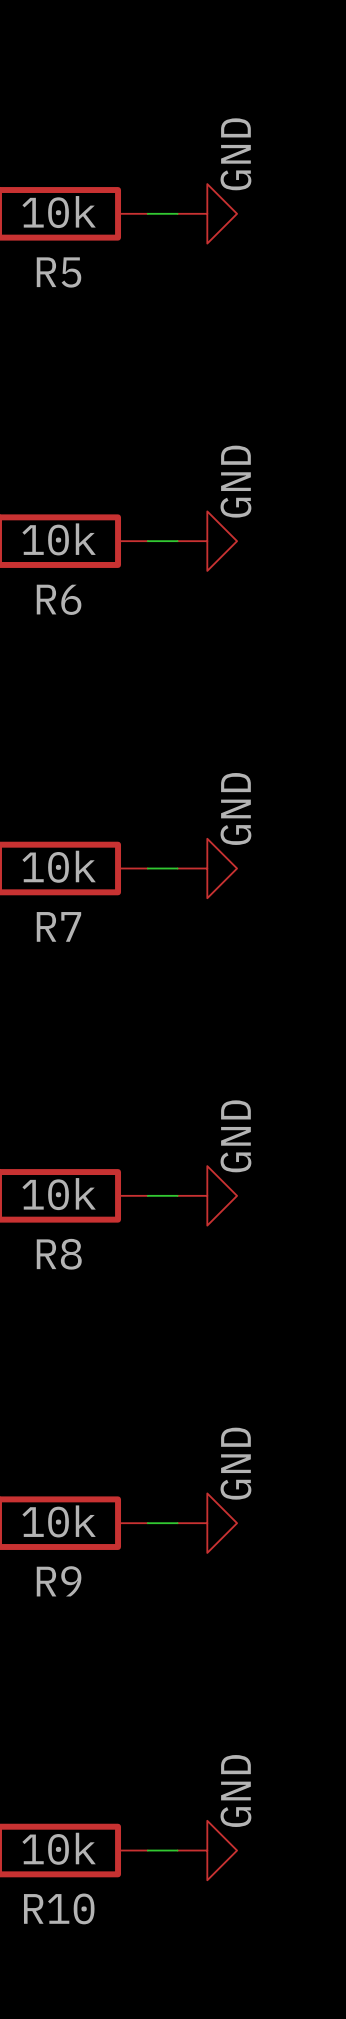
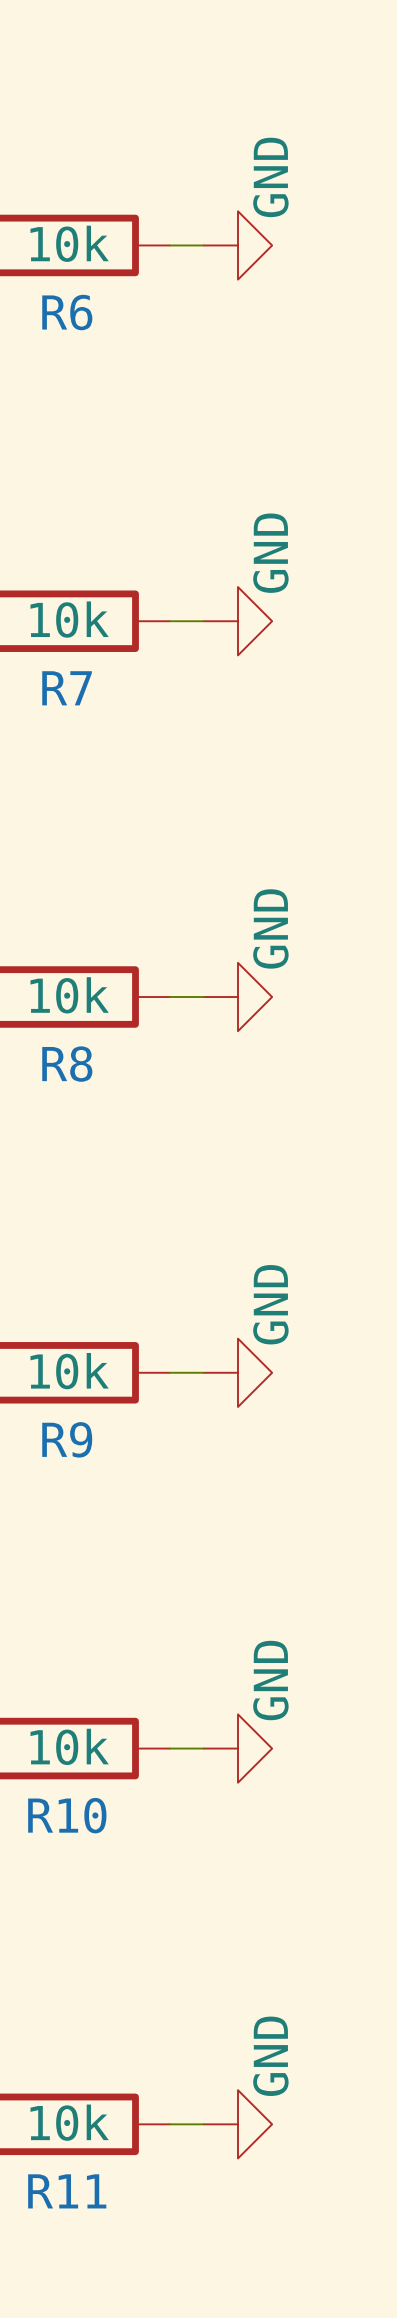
R5 name: R5 (59, 272) -> R6 (67, 312)
R6 name: R6 (59, 599) -> R7 (67, 688)
R7 name: R7 (58, 926) -> R8 (67, 1064)
R8 name: R8 (59, 1254) -> R9 (67, 1439)
R9 name: R9 (59, 1581) -> R10 (67, 1815)
R10 name: R10 (59, 1908) -> R11 (67, 2191)

